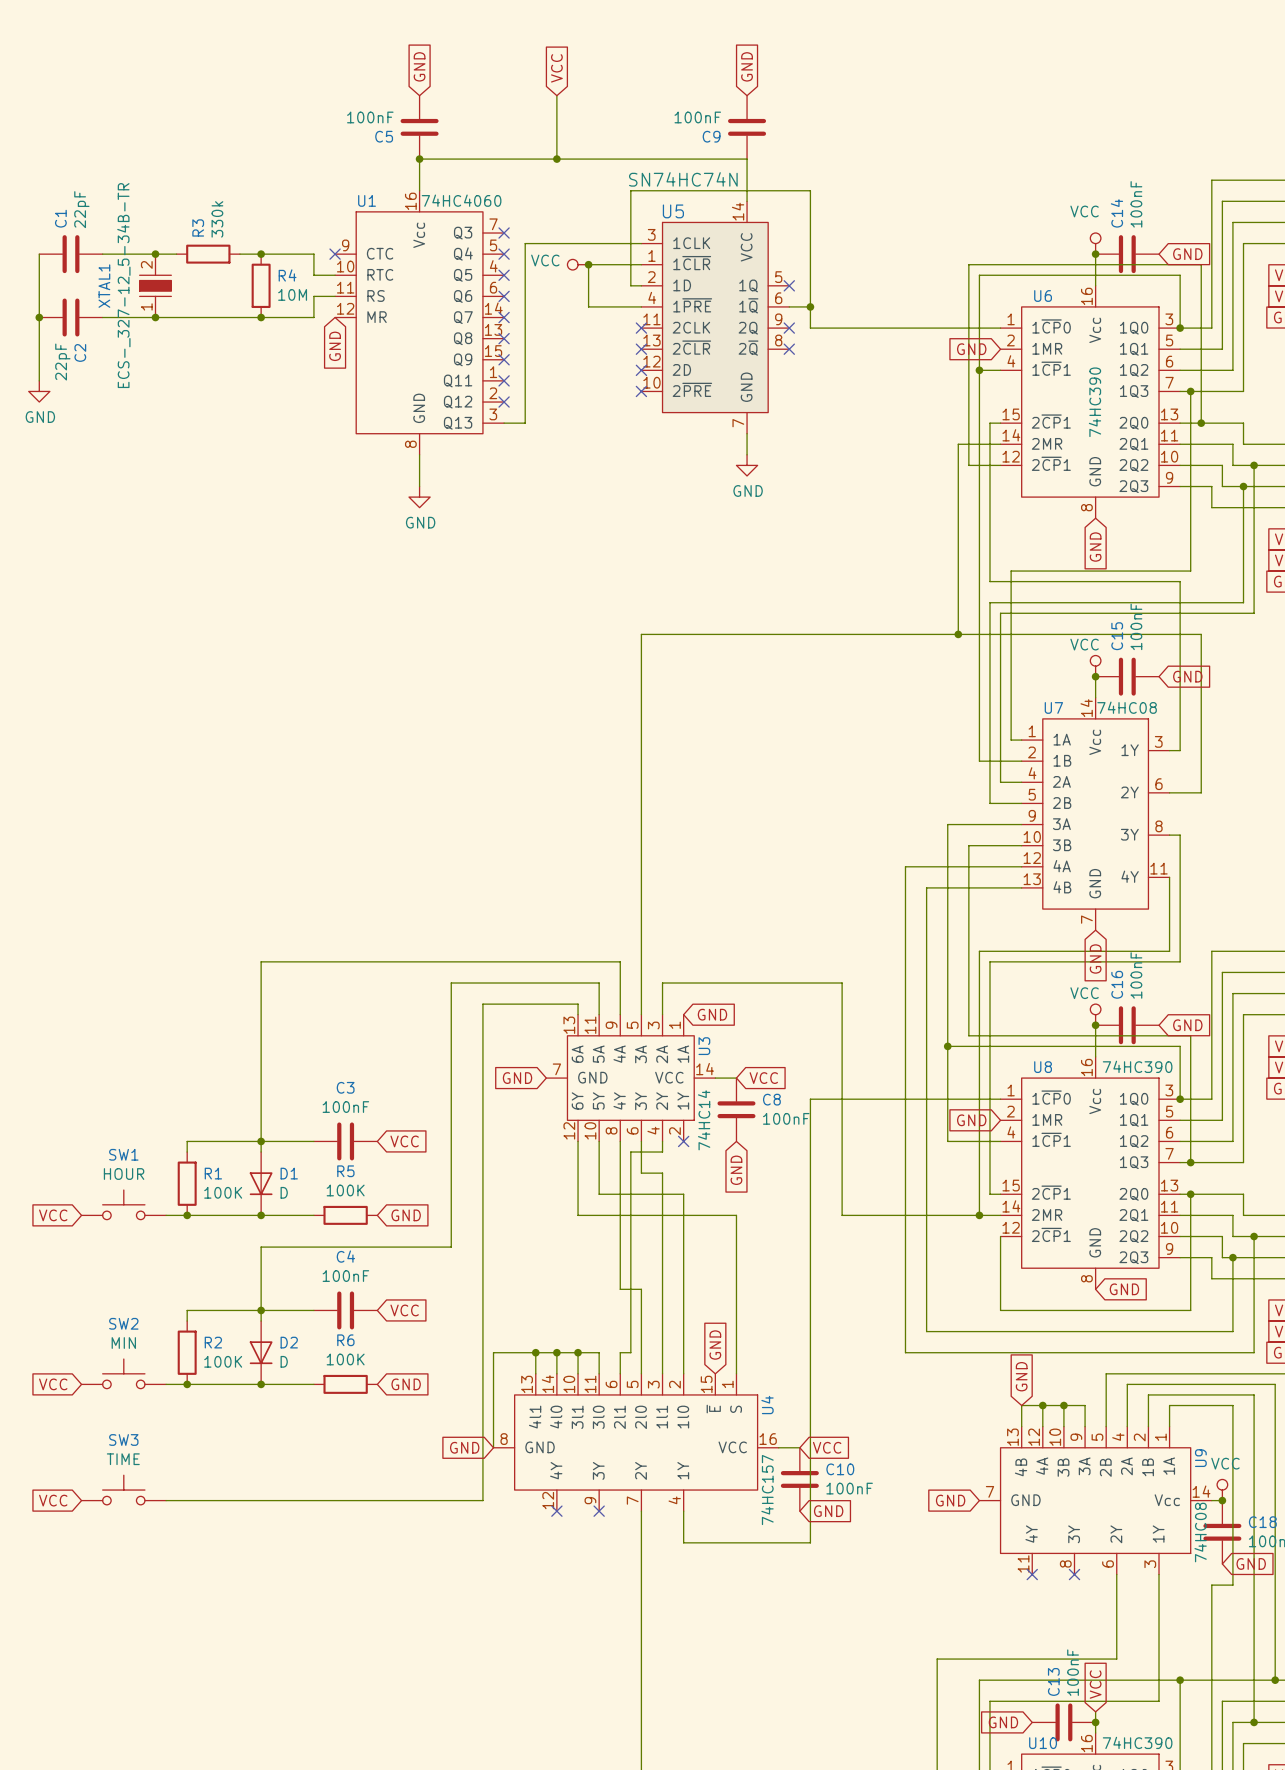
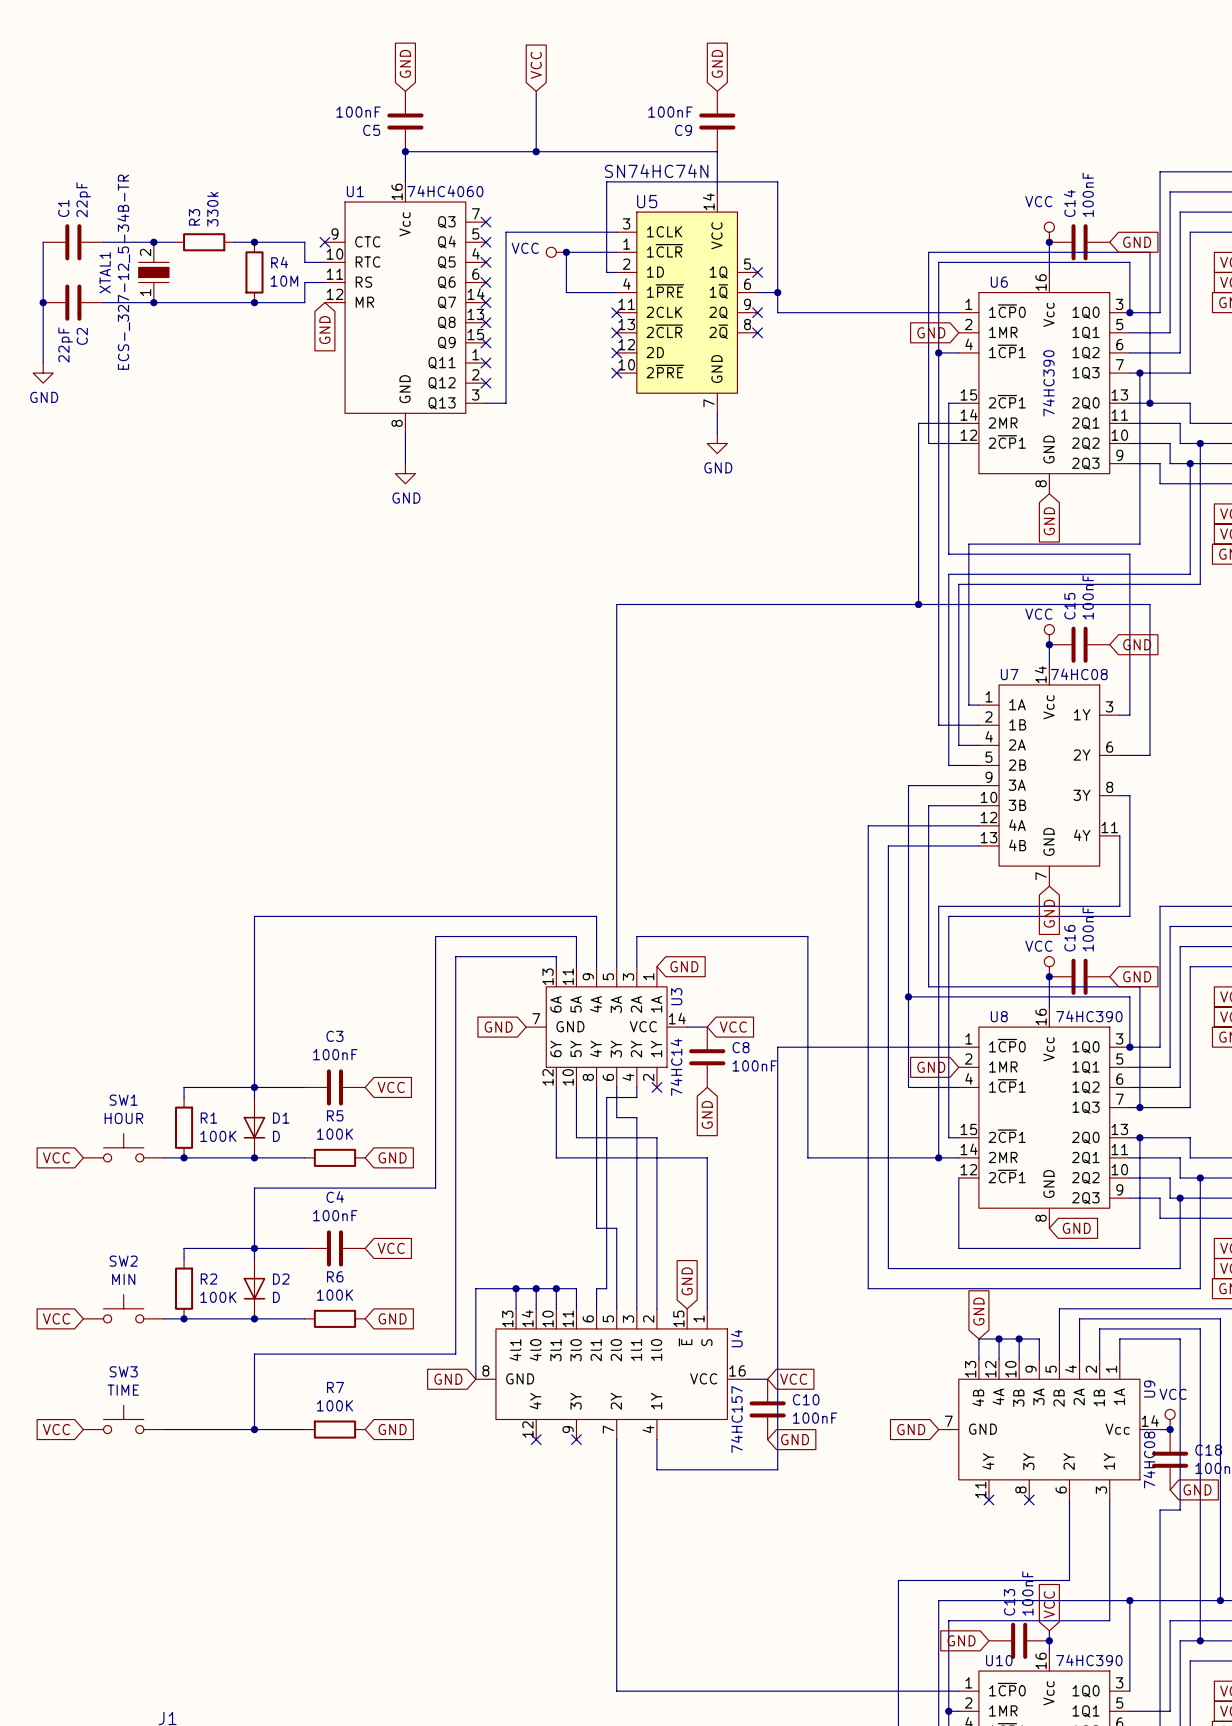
wire: (482, 1004) (482, 1500) (313, 1500) -> (465, 956) (455, 956) (455, 1354) (254, 1354) (254, 1429)
junction: none -> (254, 1429)
R7: none -> 100K (334, 1429)
global label: none -> GND (392, 1429)

